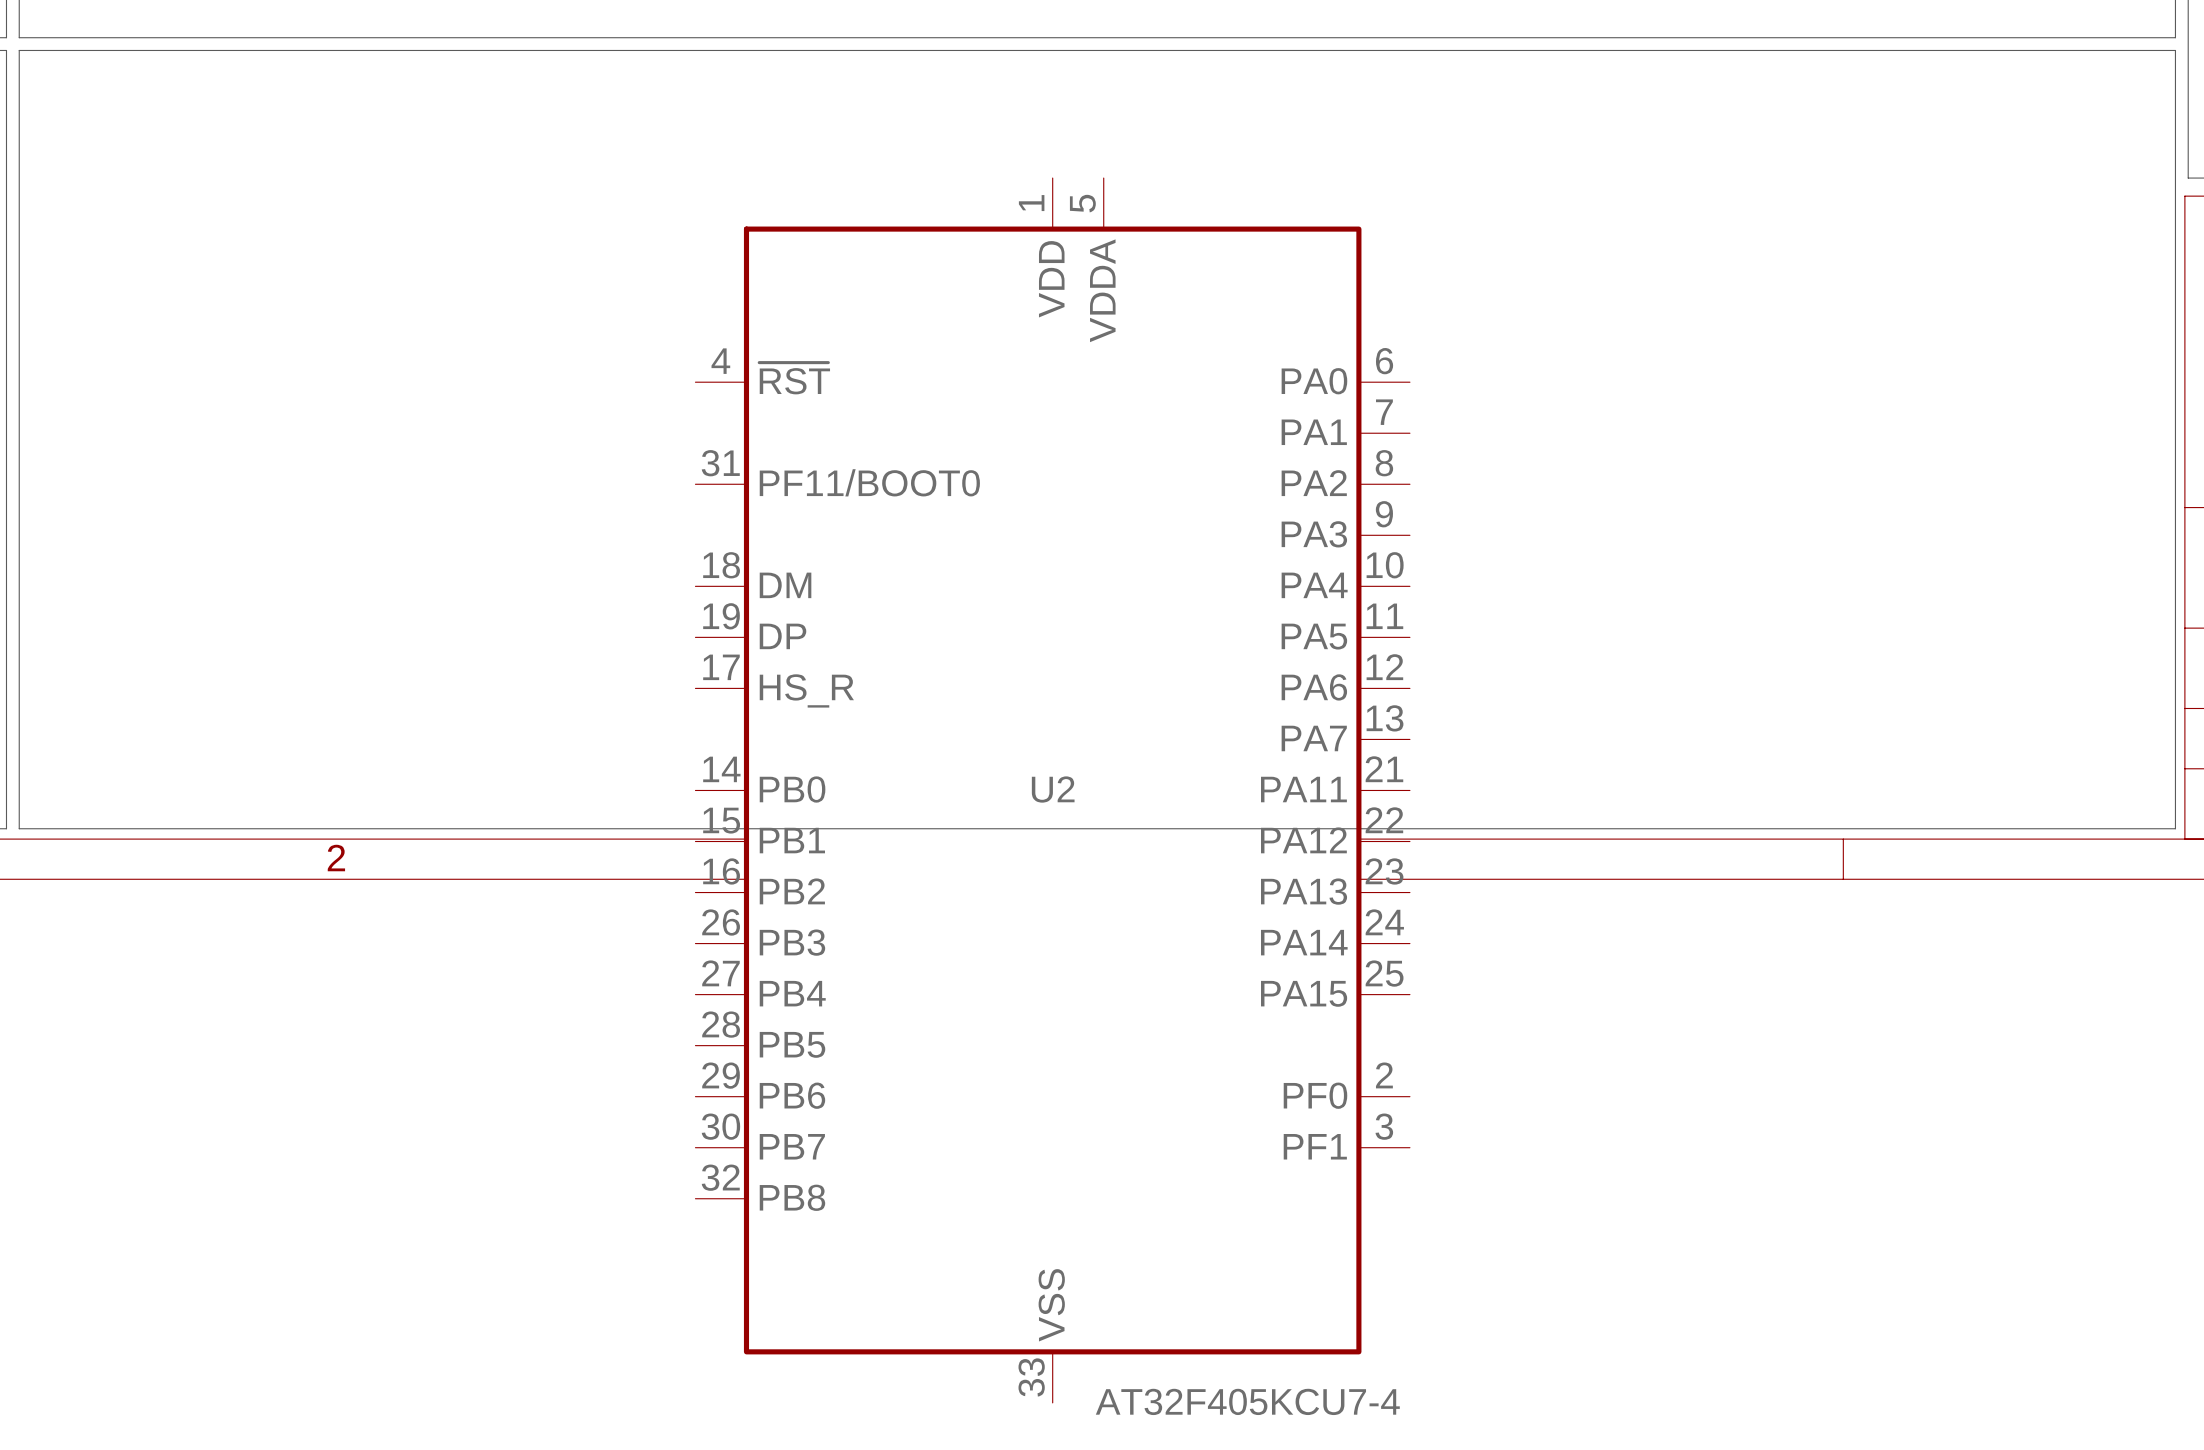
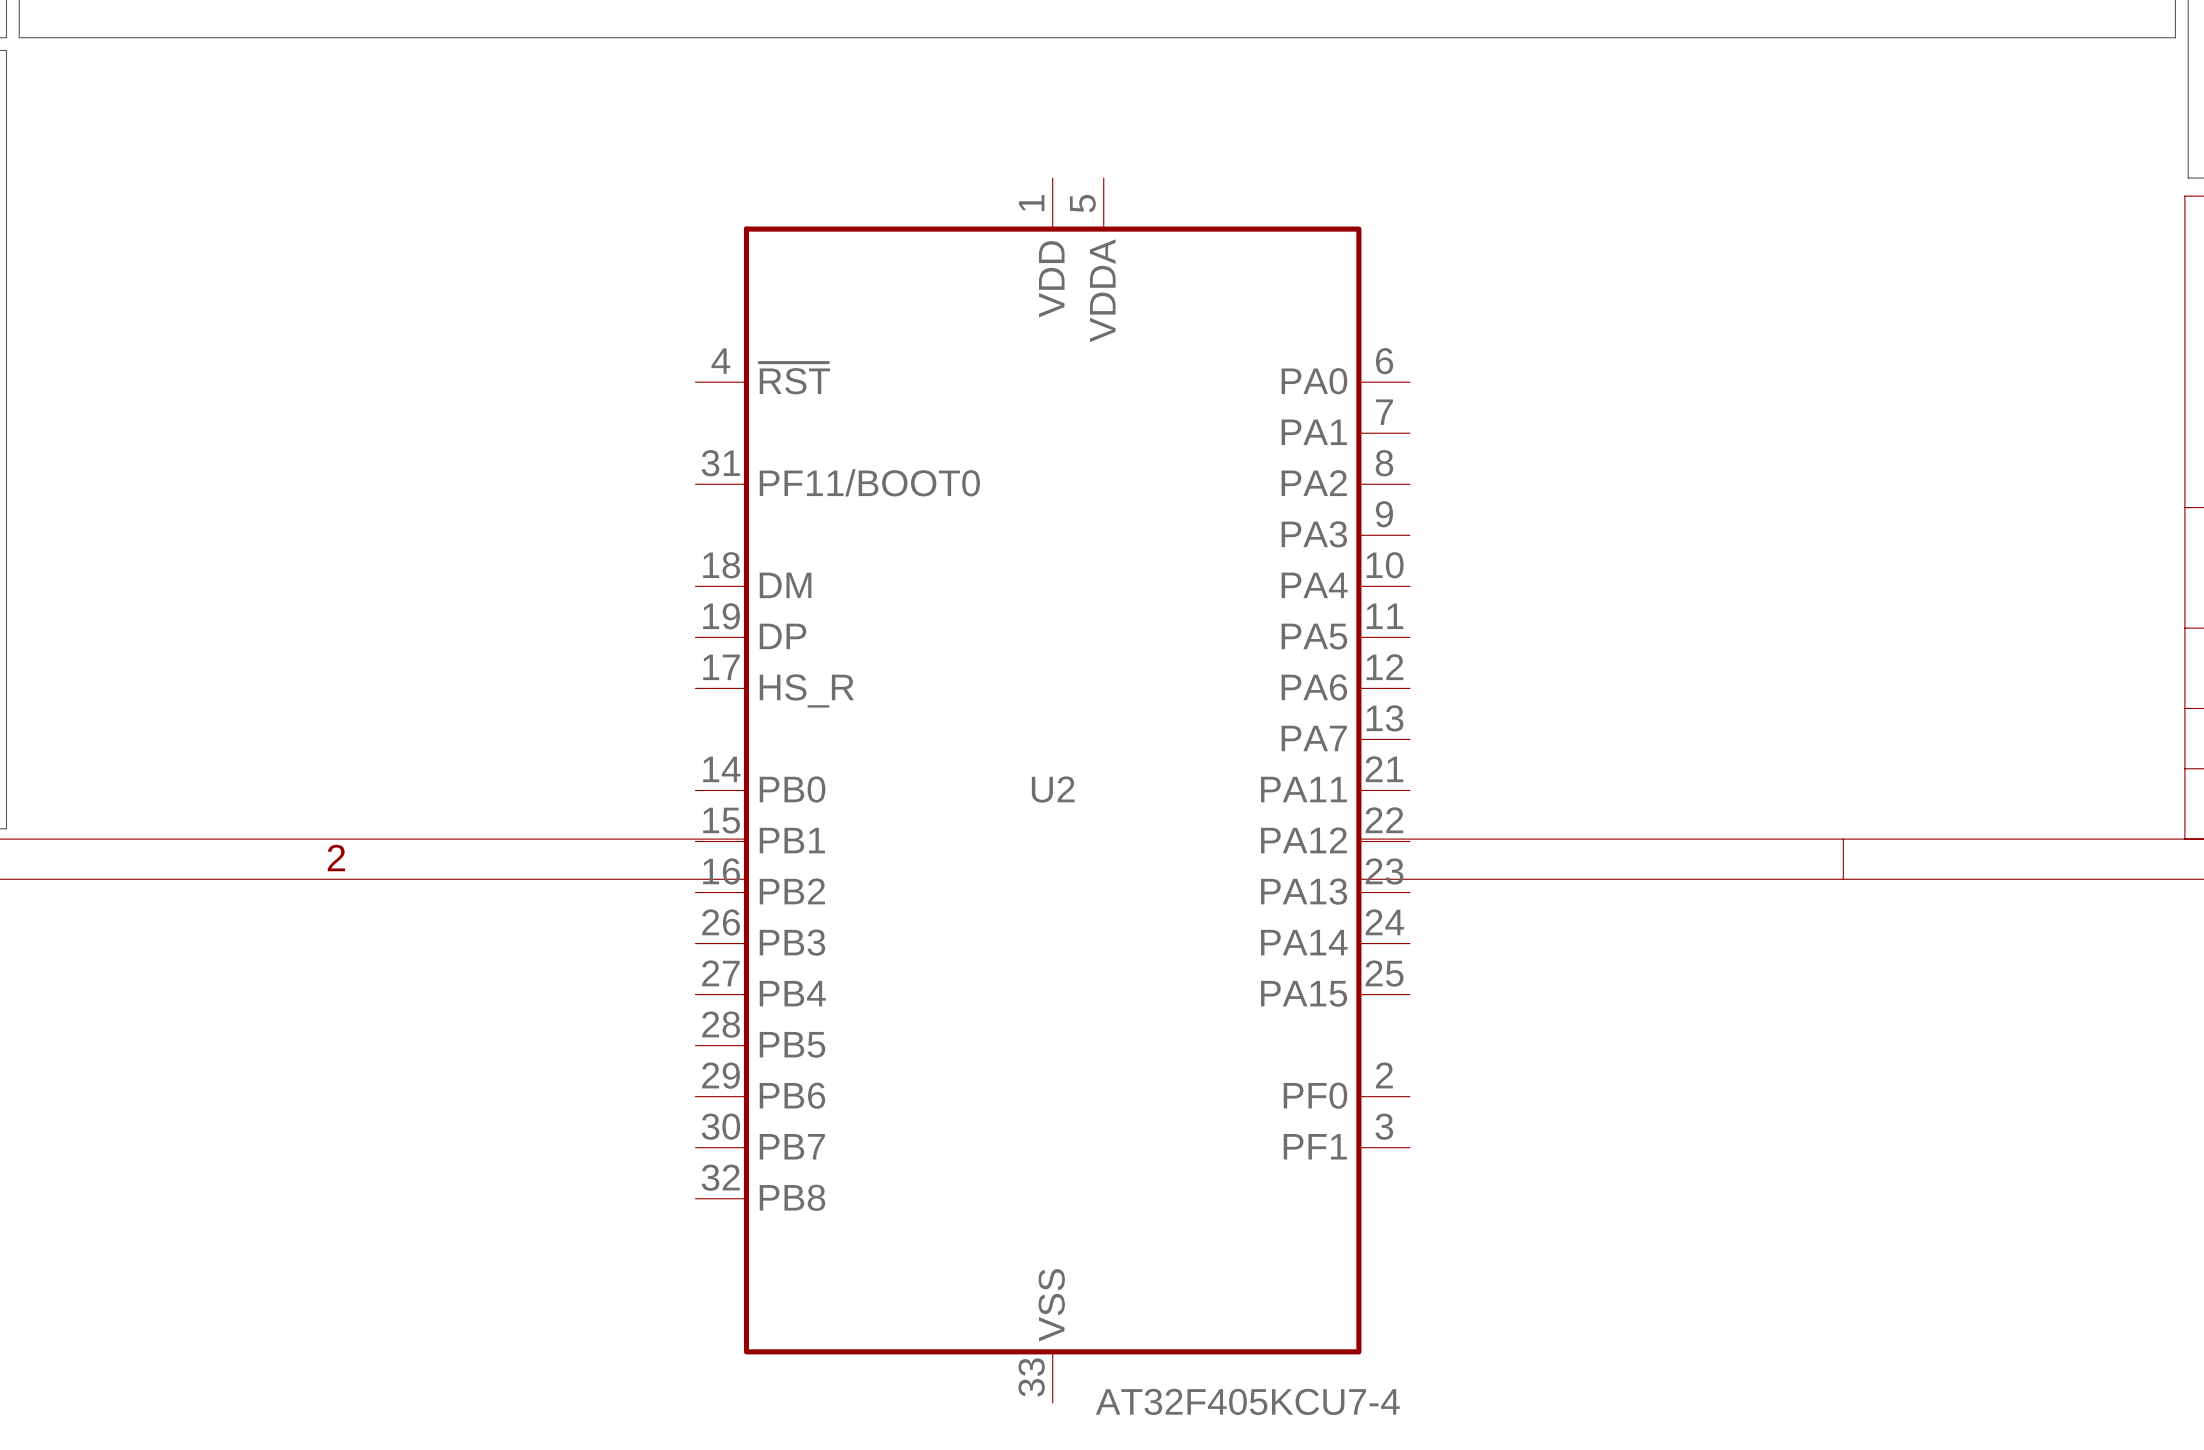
line: (19, 50) (2175, 50) (2175, 828) (19, 828) (19, 50) -> none

